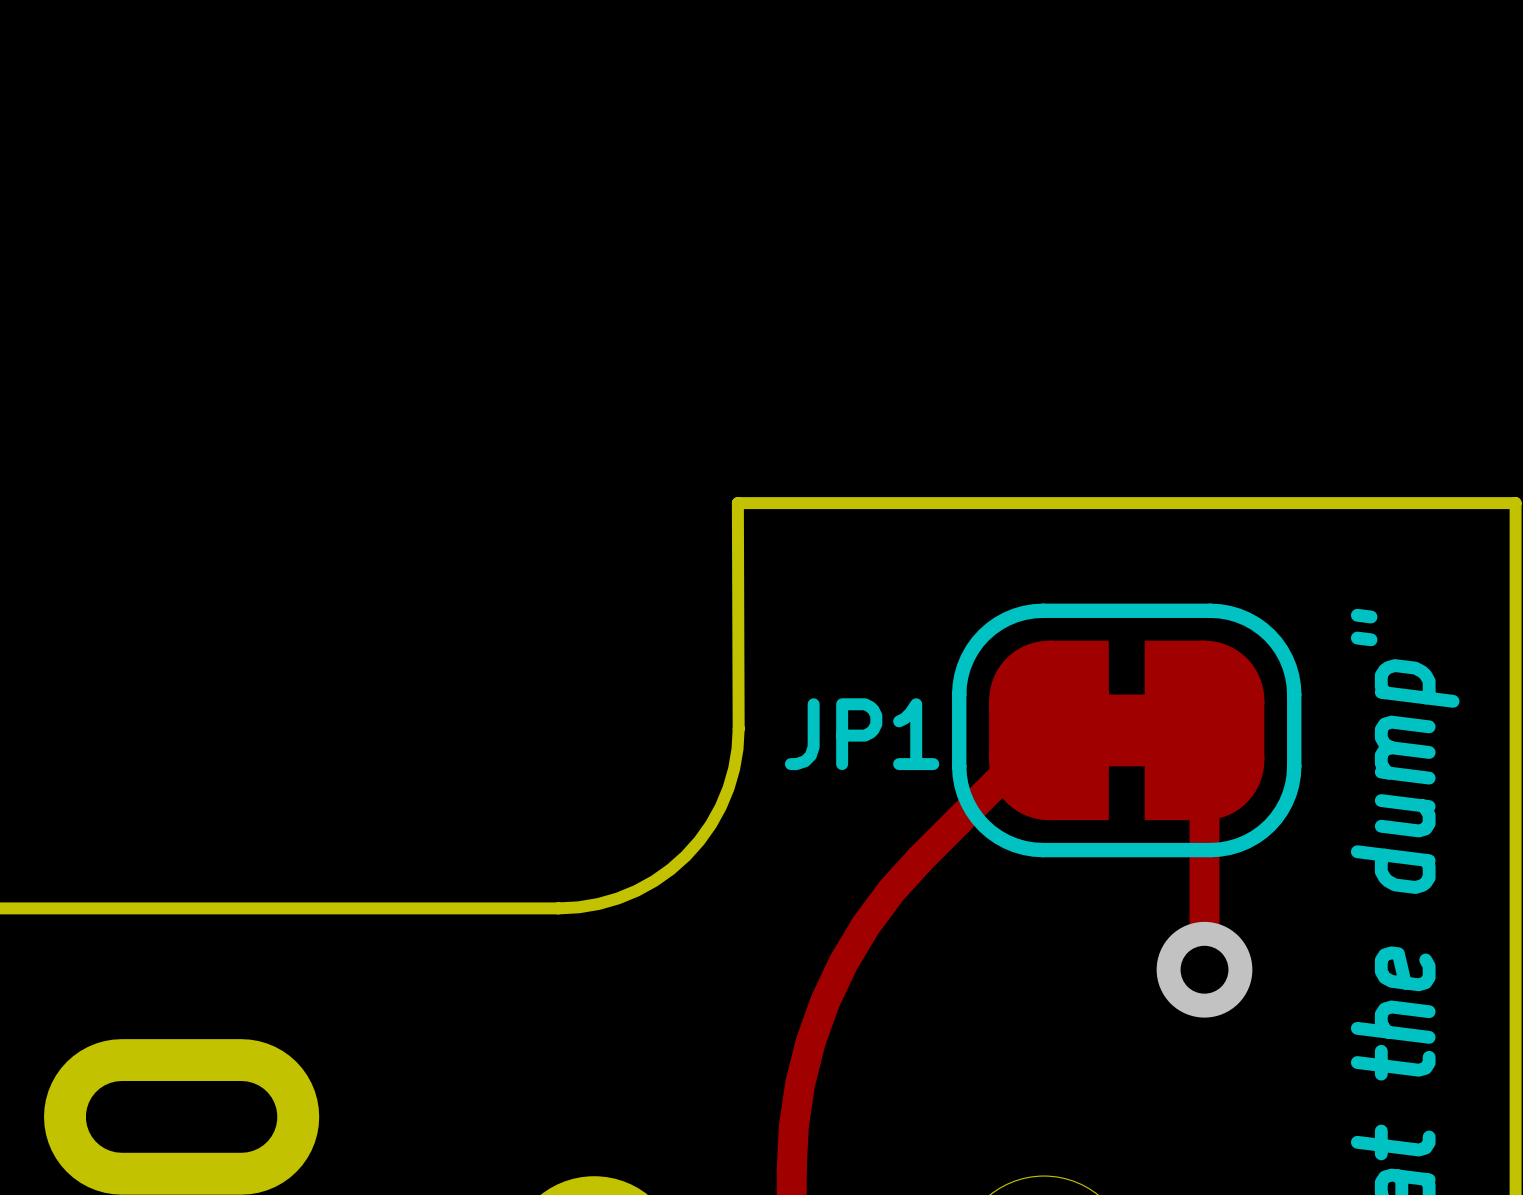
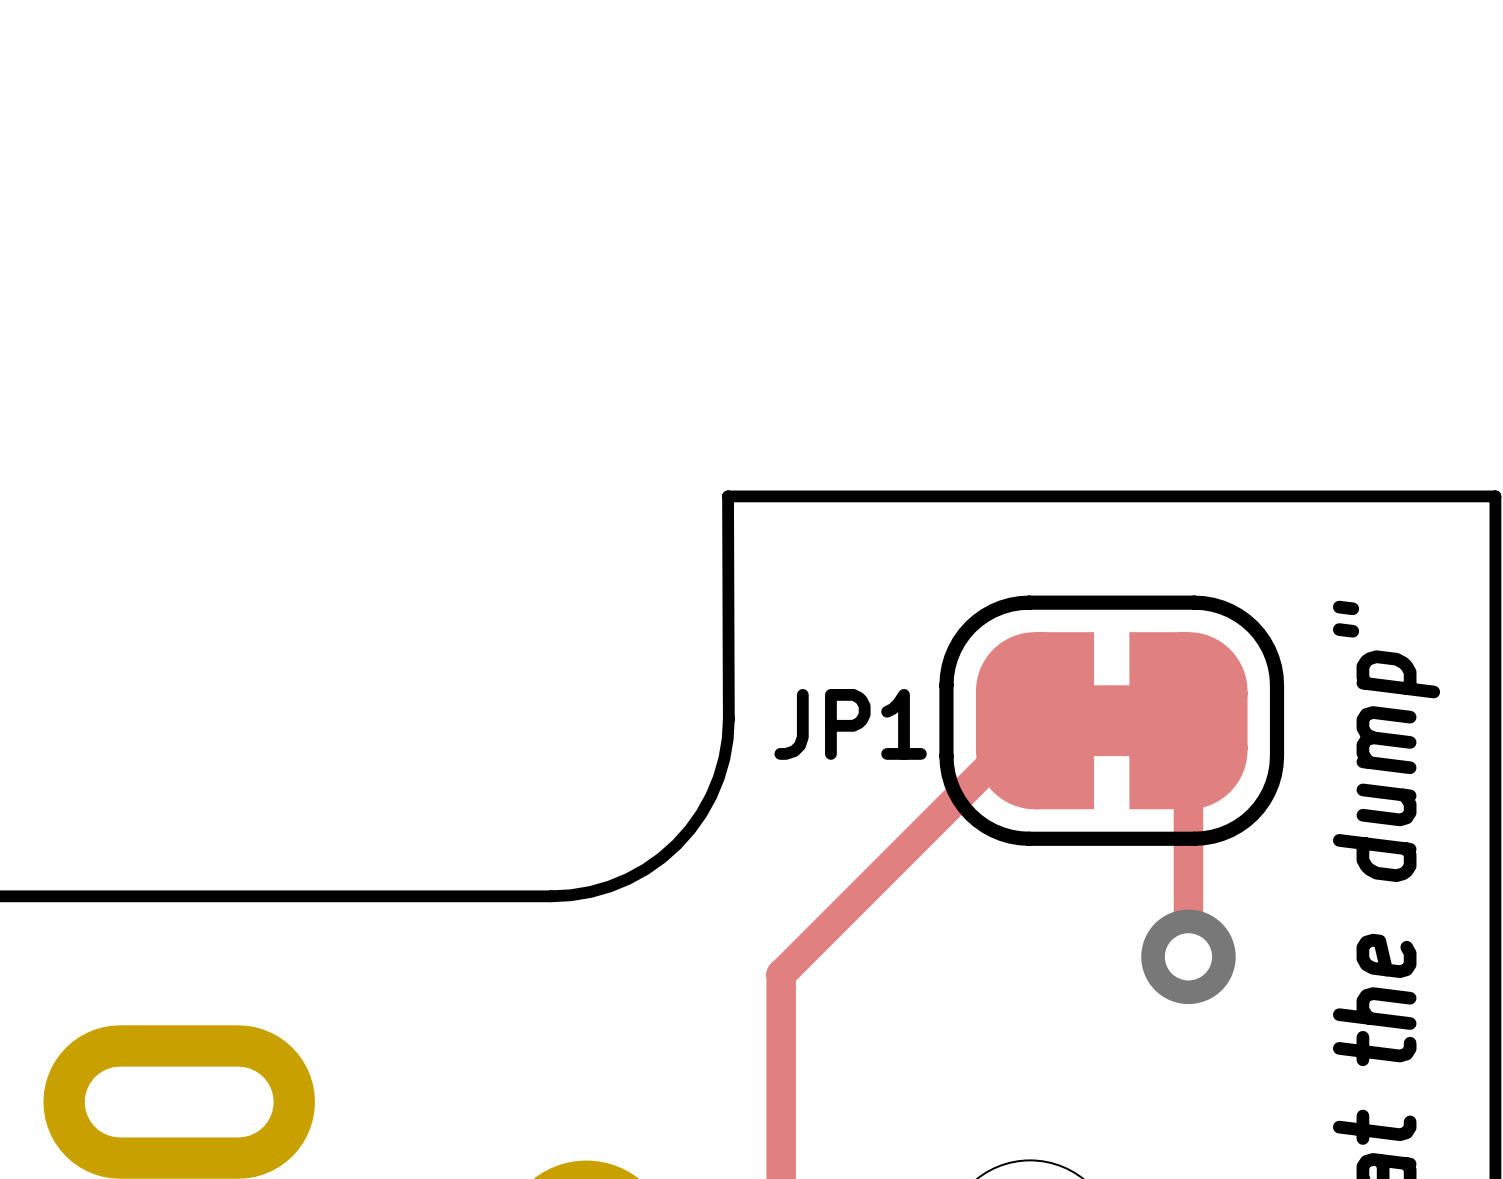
track: (920, 859) (891, 890) (865, 925) (843, 962) (825, 1001) (810, 1042) (800, 1083) (793, 1126) (791, 1169) -> (908, 847) (781, 974) (781, 1154)

